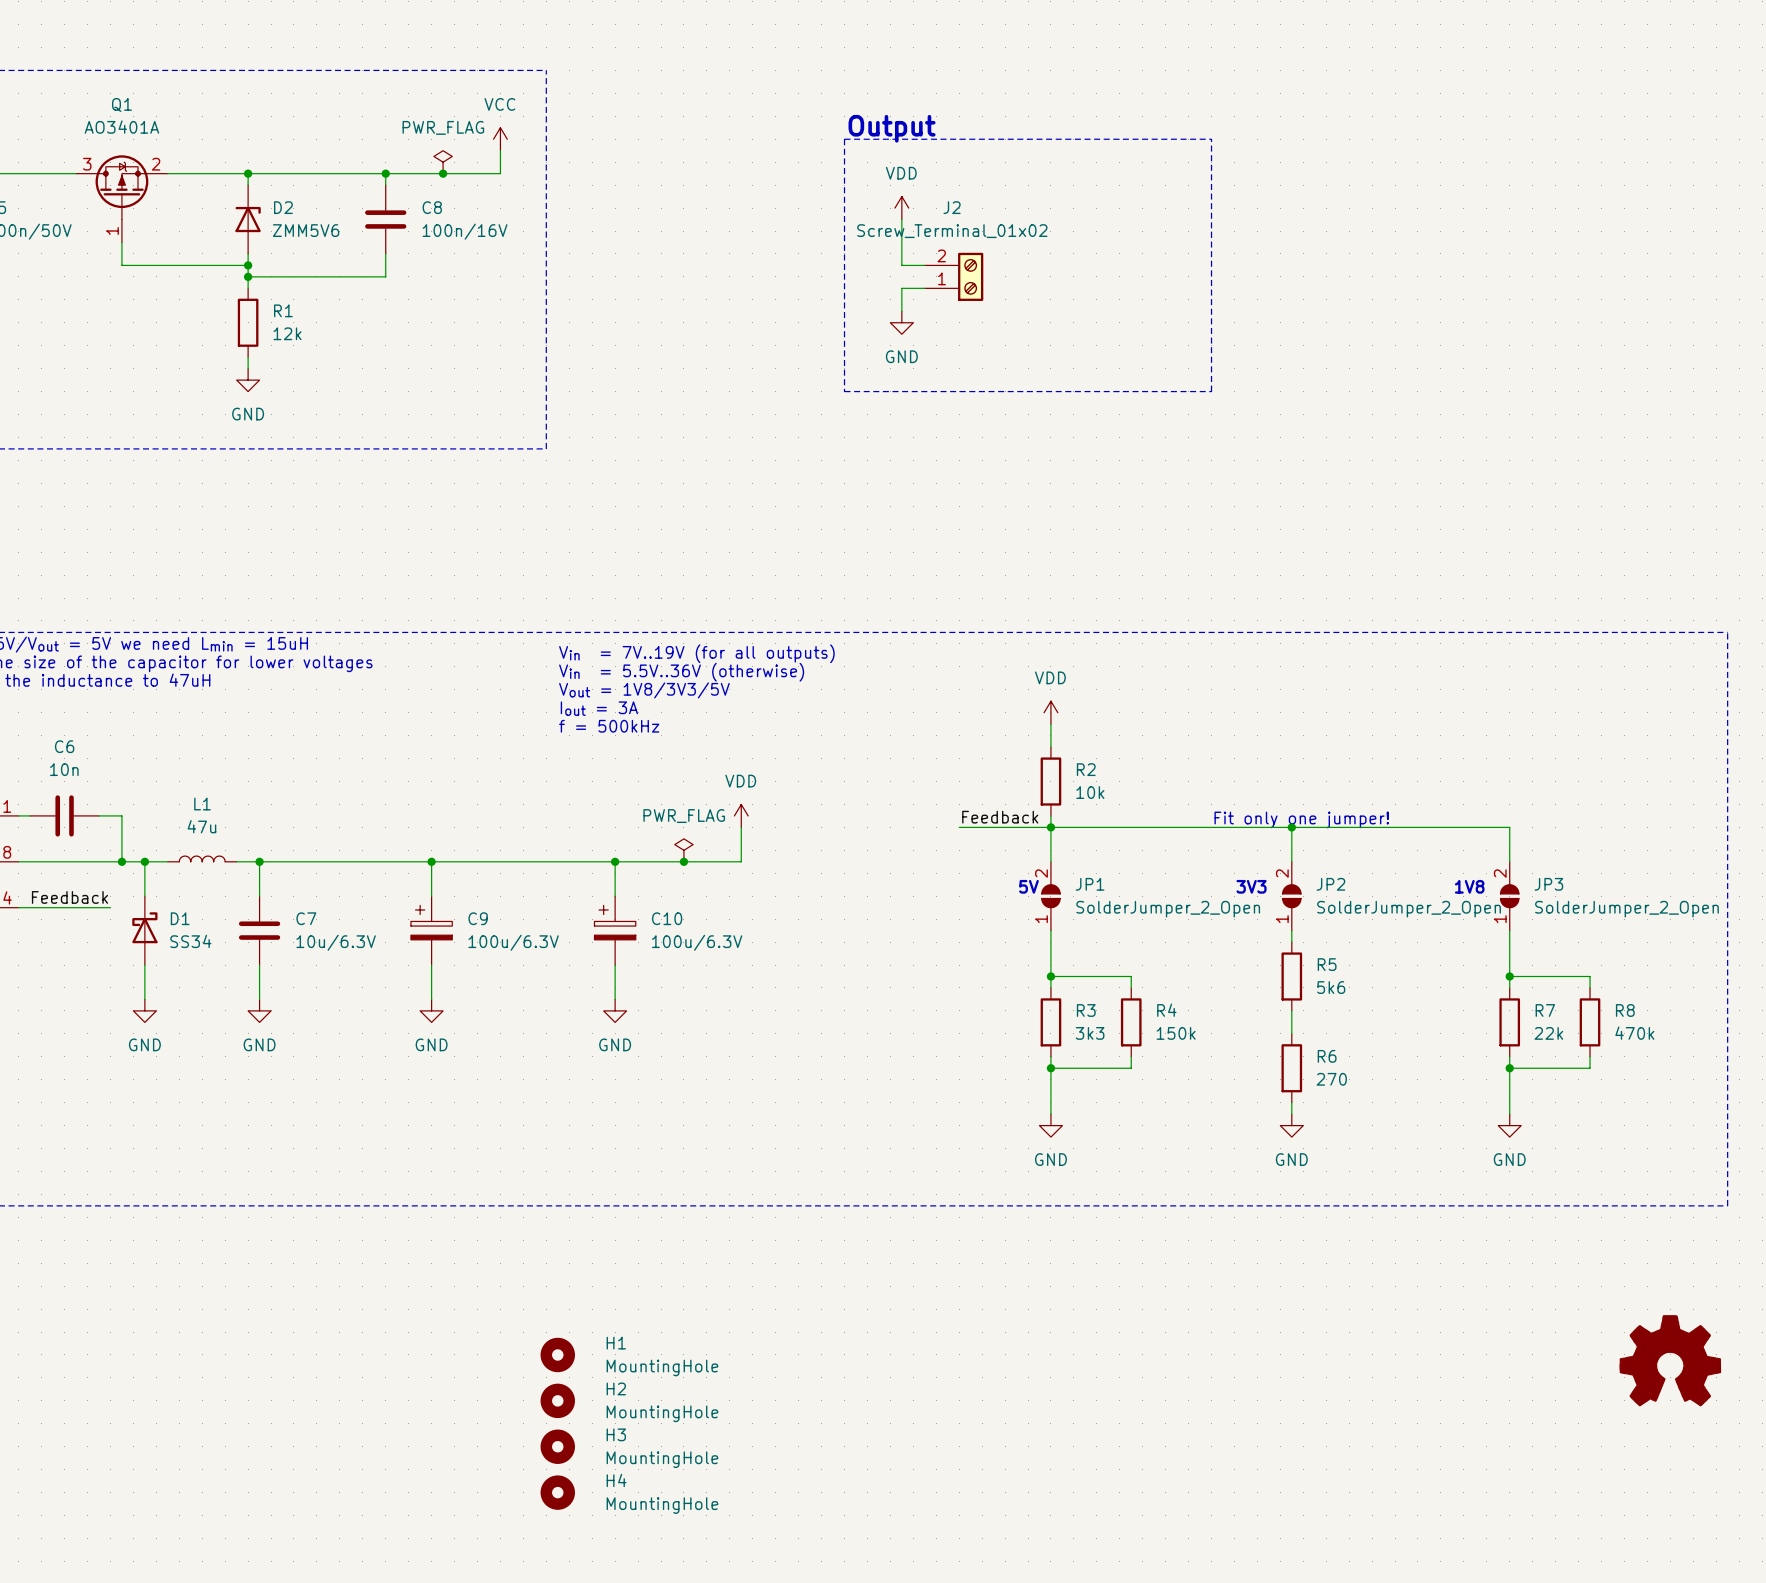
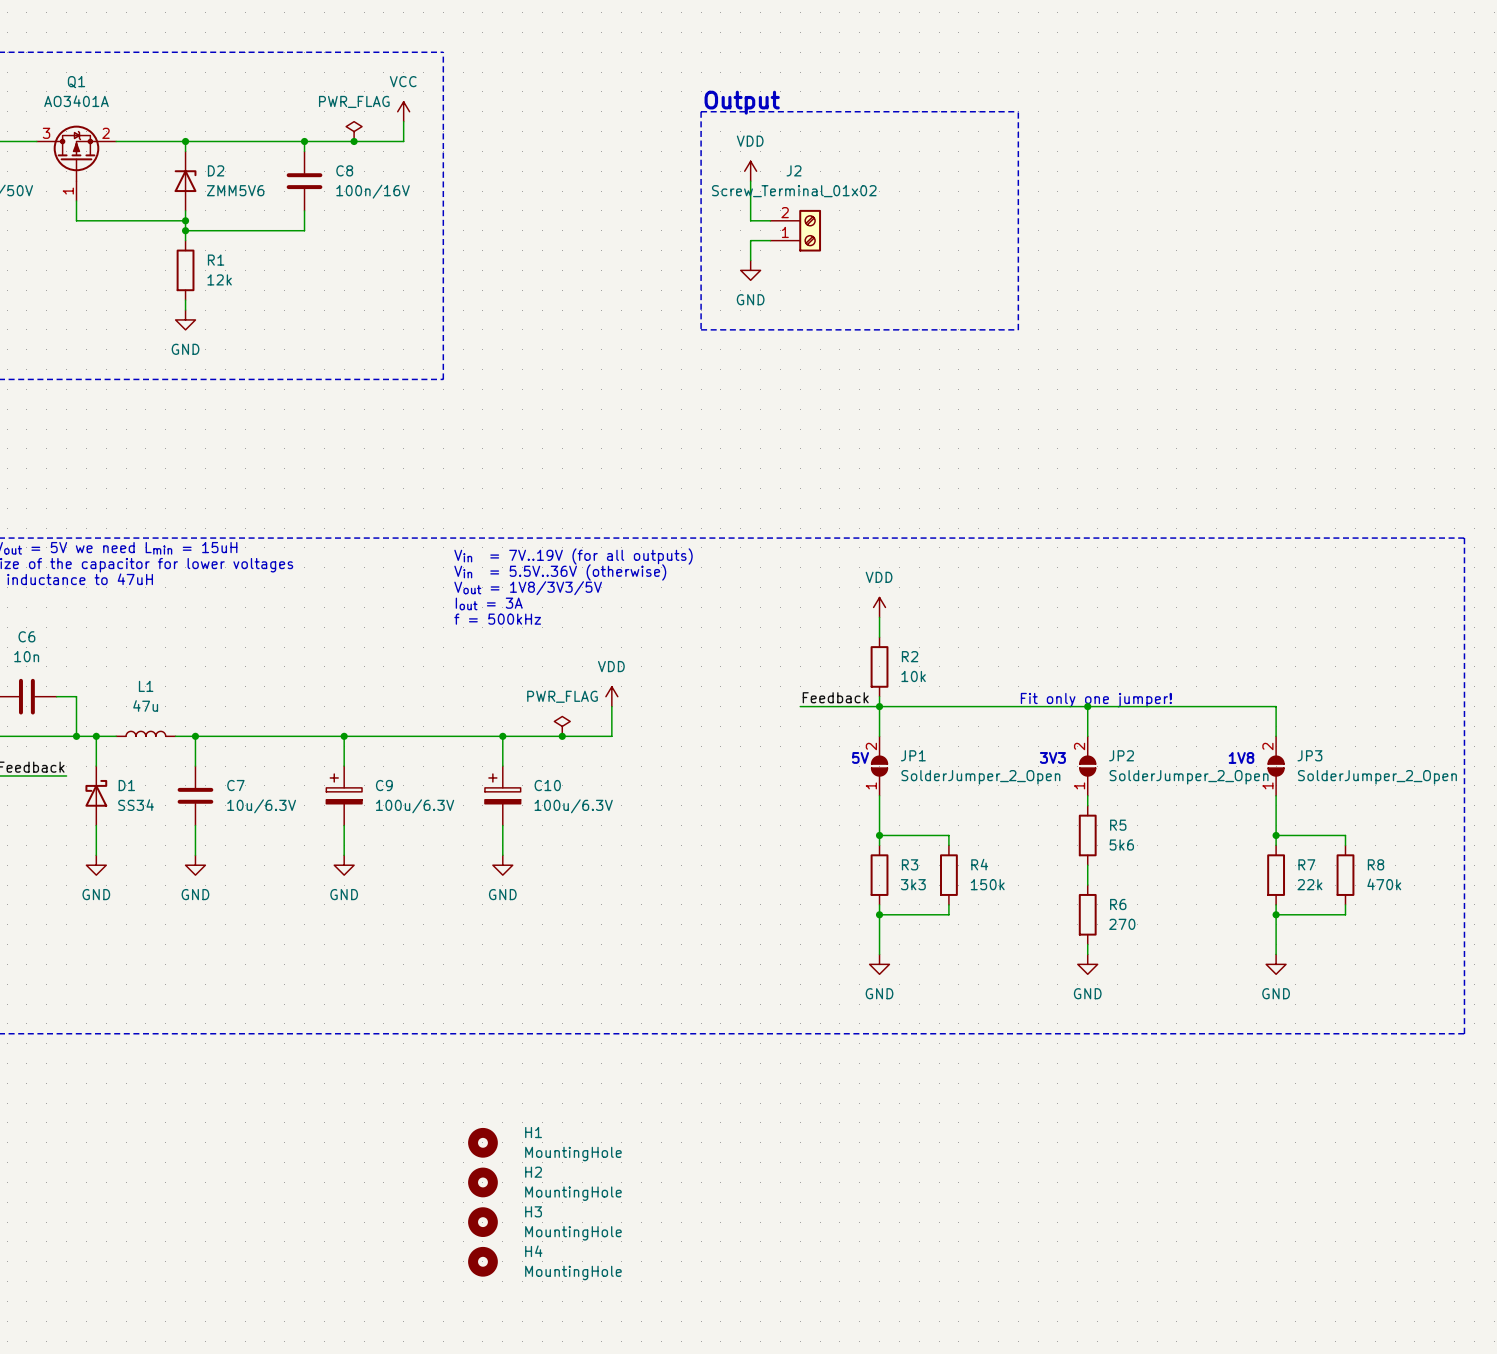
H1 position: (557, 1354) -> (482, 1142)
part: (1670, 1360) -> none
H2 position: (557, 1400) -> (482, 1182)
H3 position: (557, 1446) -> (482, 1222)
H4 position: (557, 1492) -> (482, 1261)

